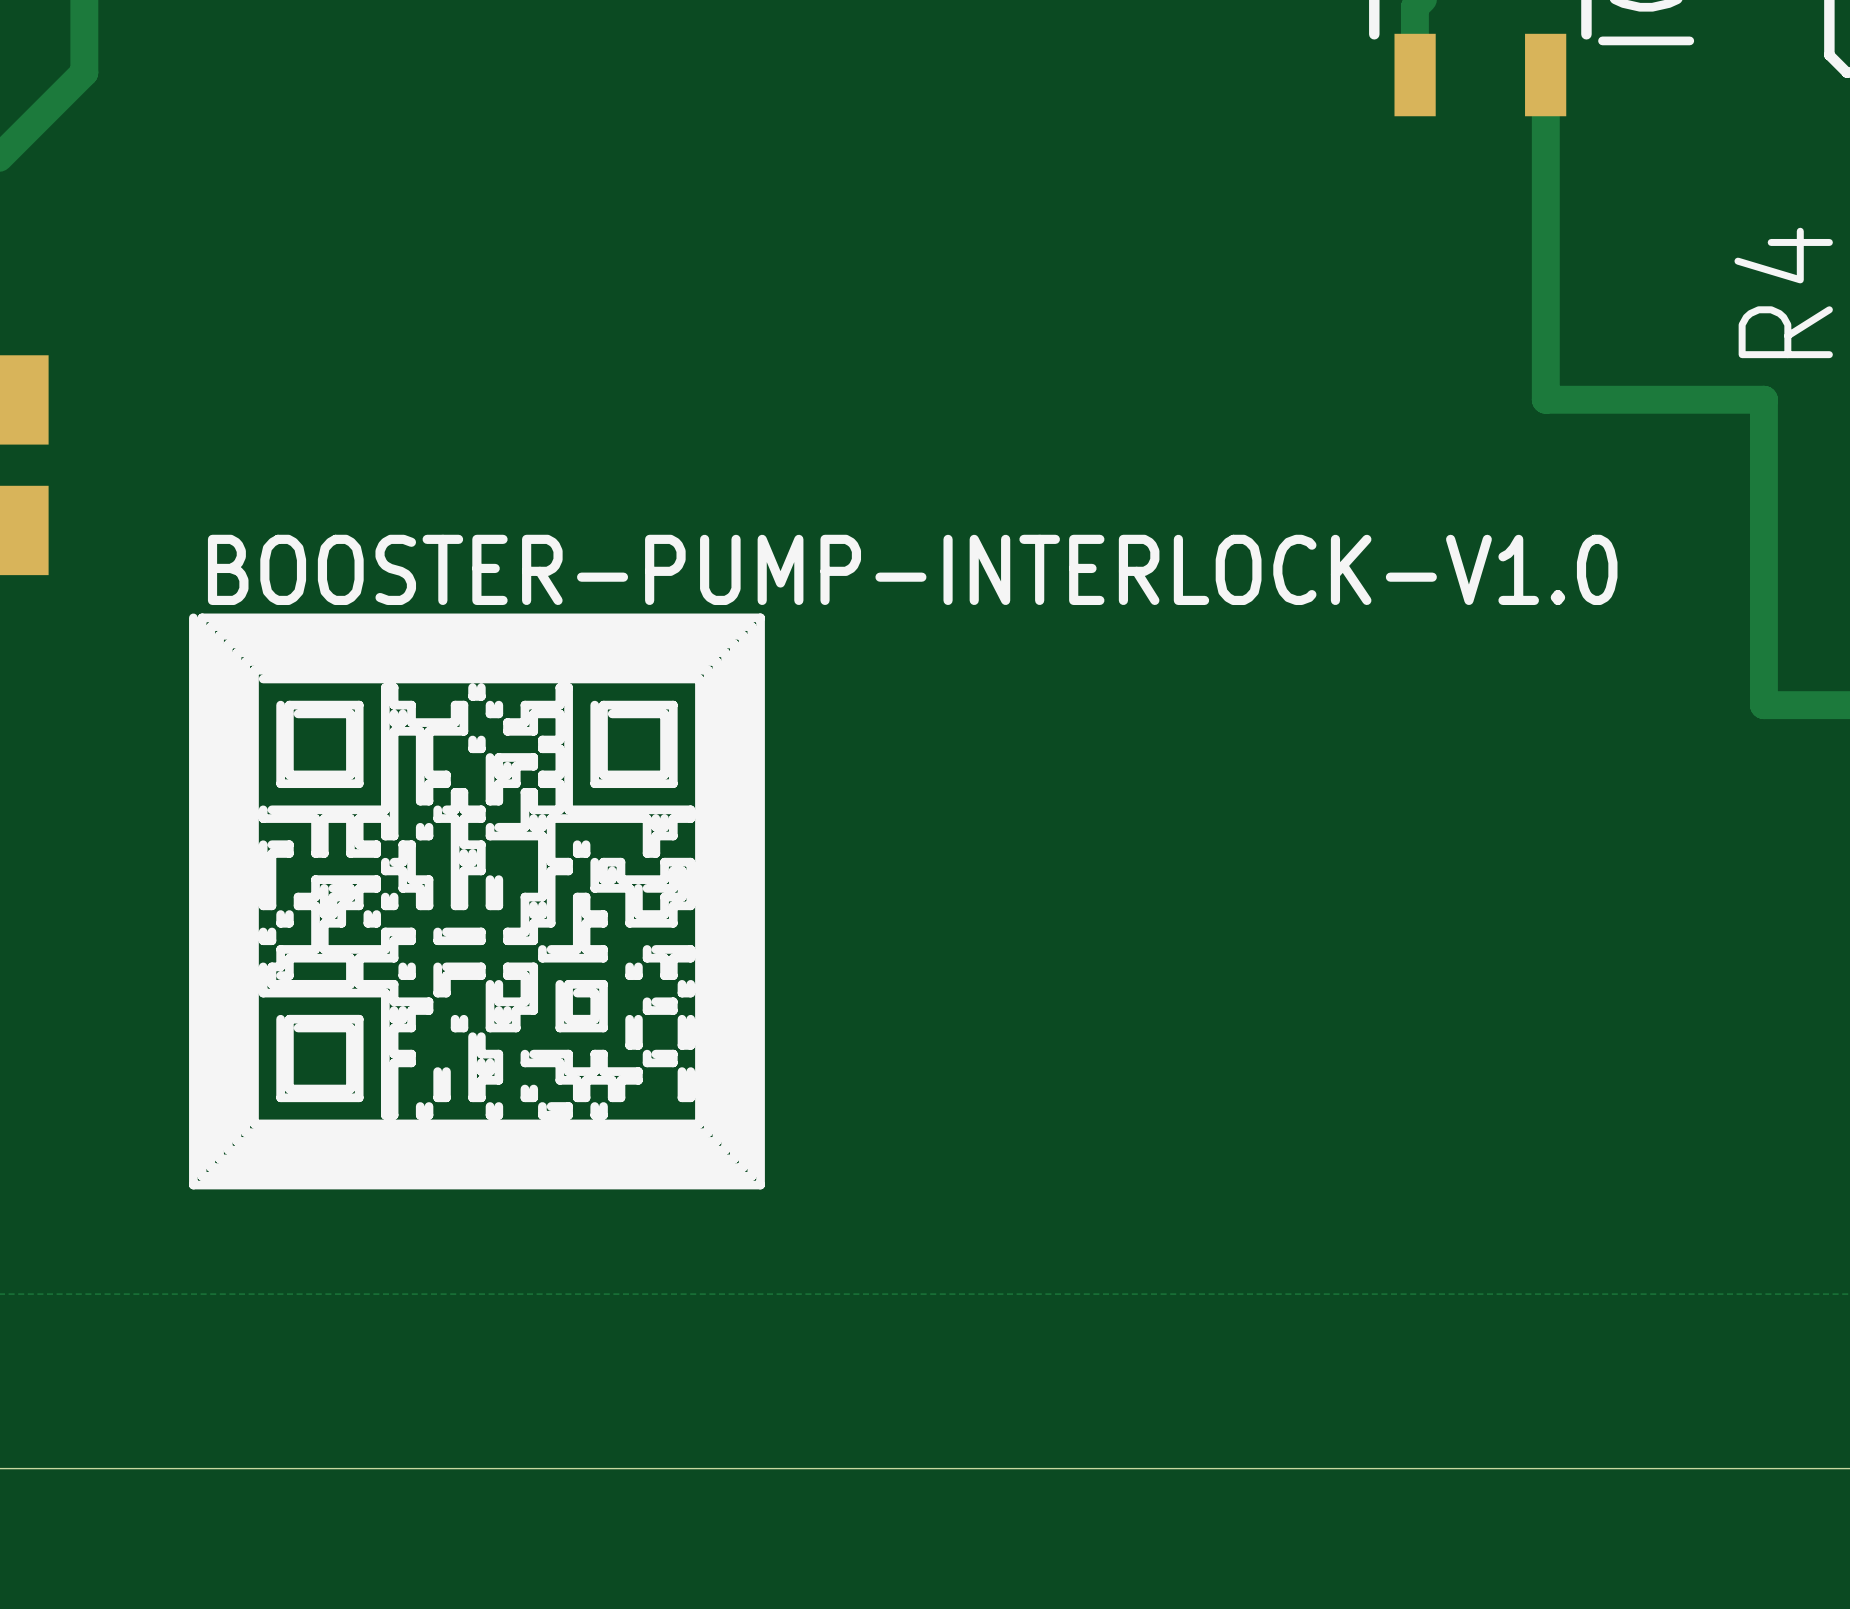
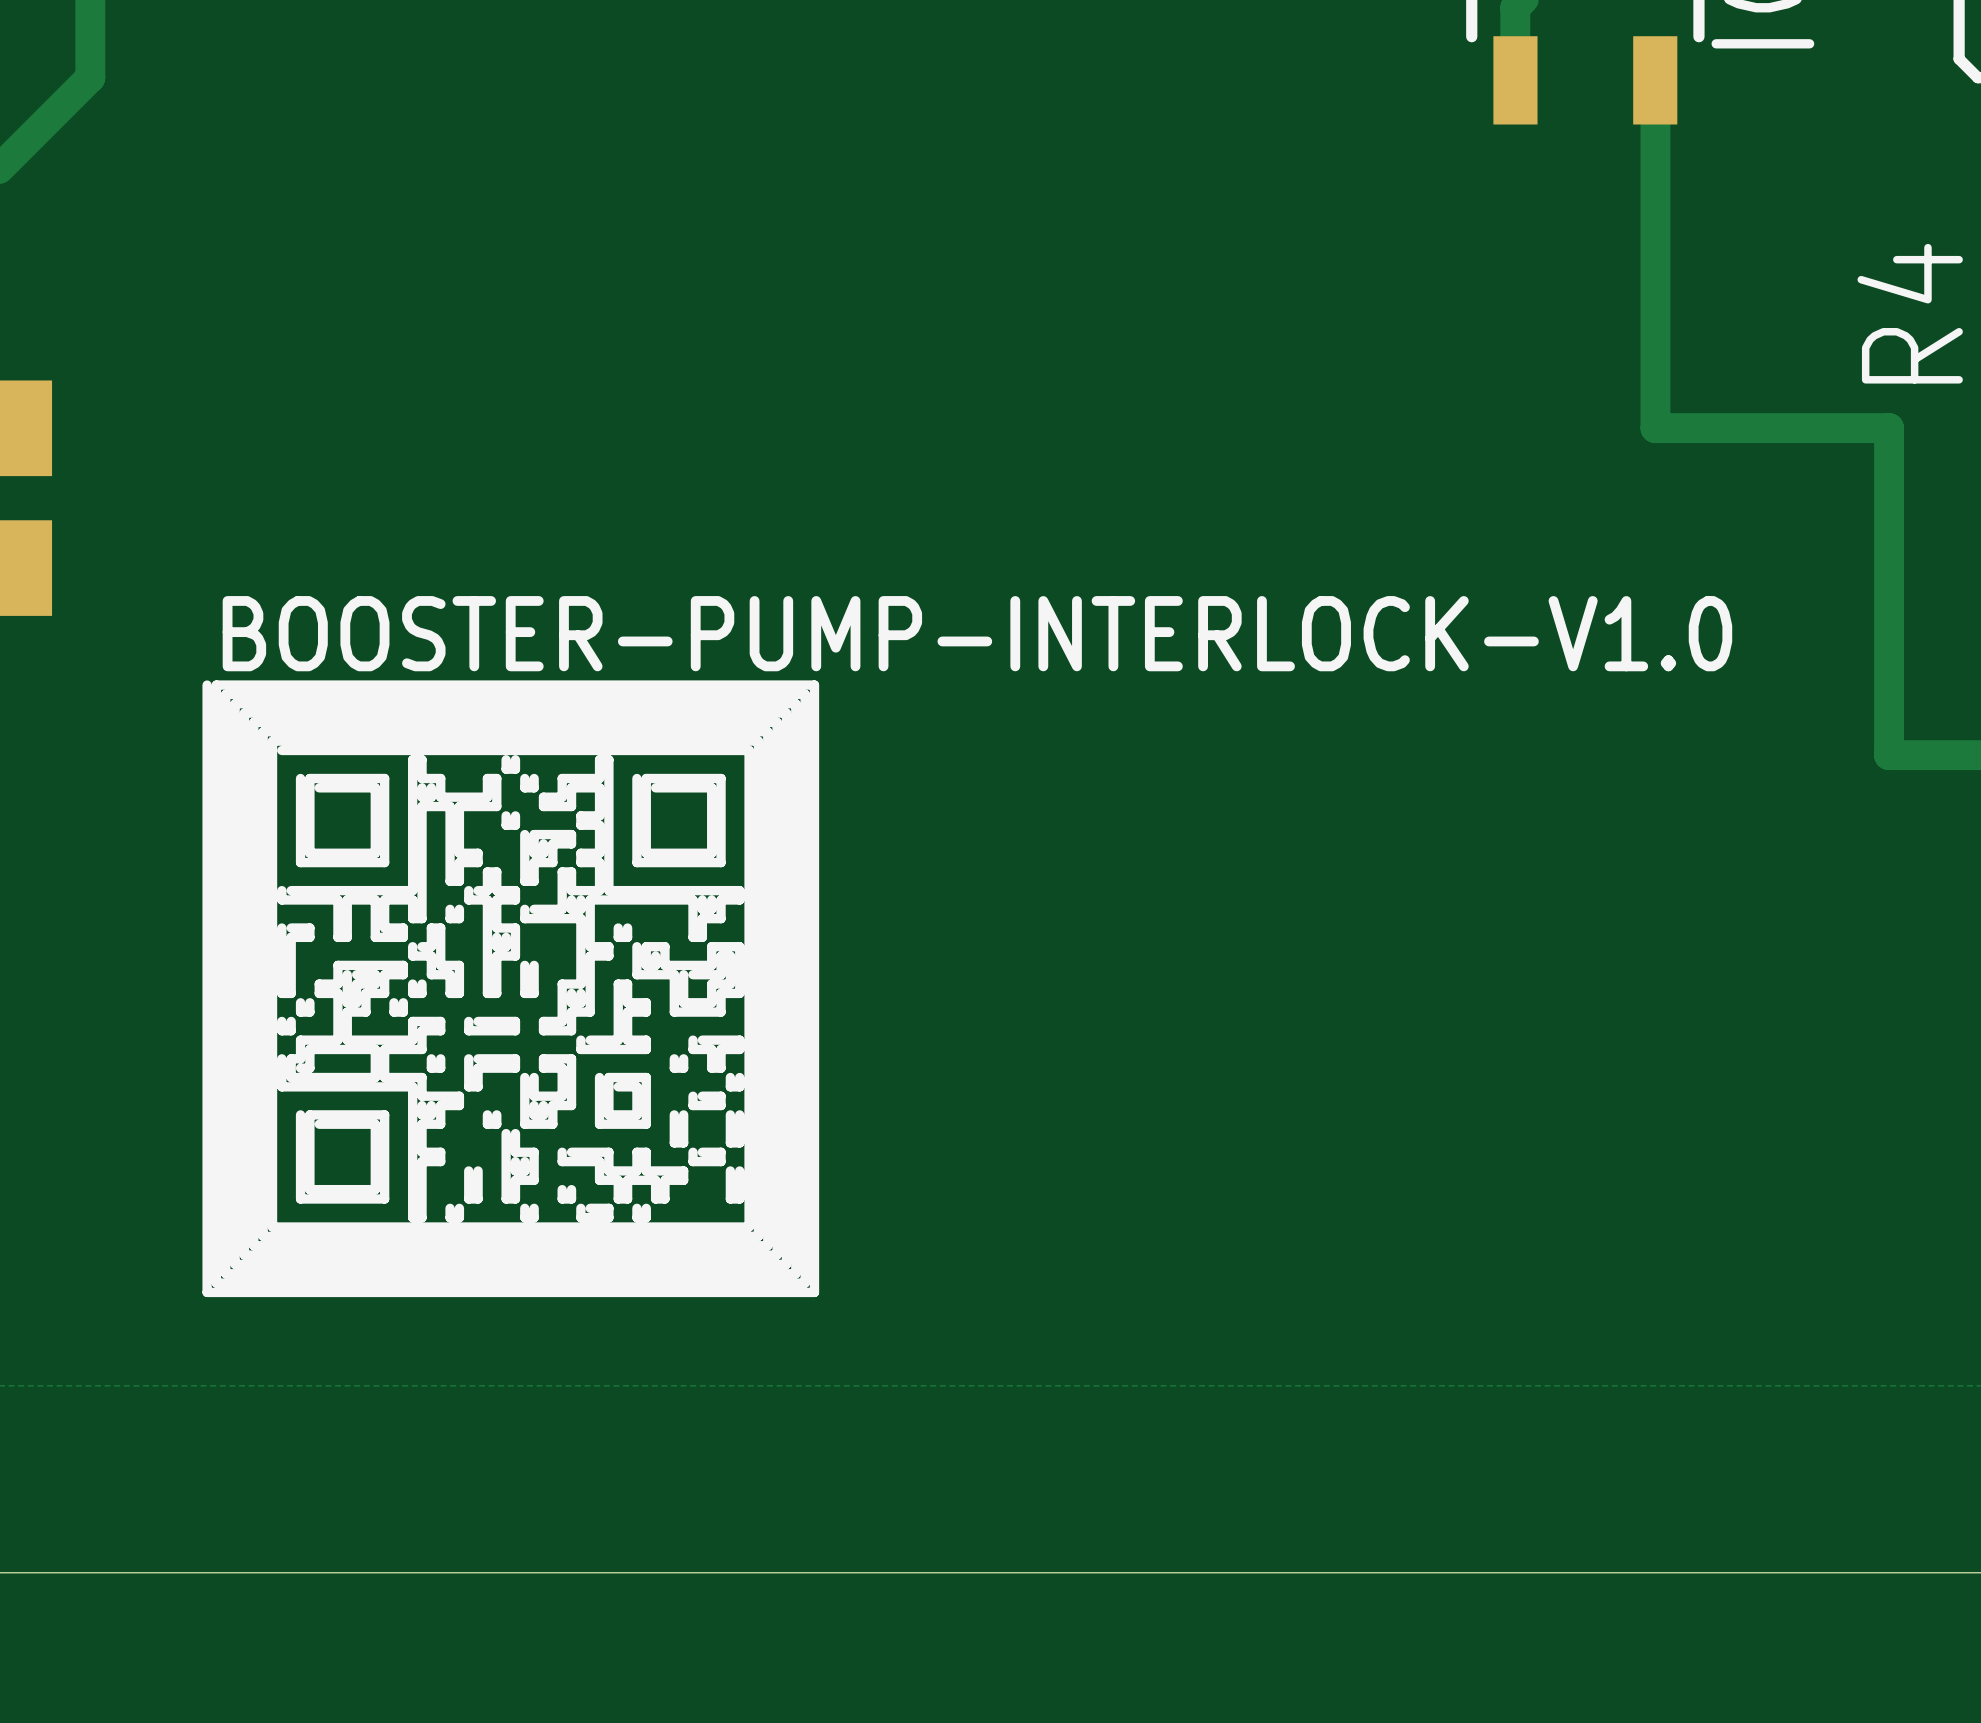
BOOSTER-PUMP-INTERLOCK-V1.0 position: (476, 901) -> (510, 988)

